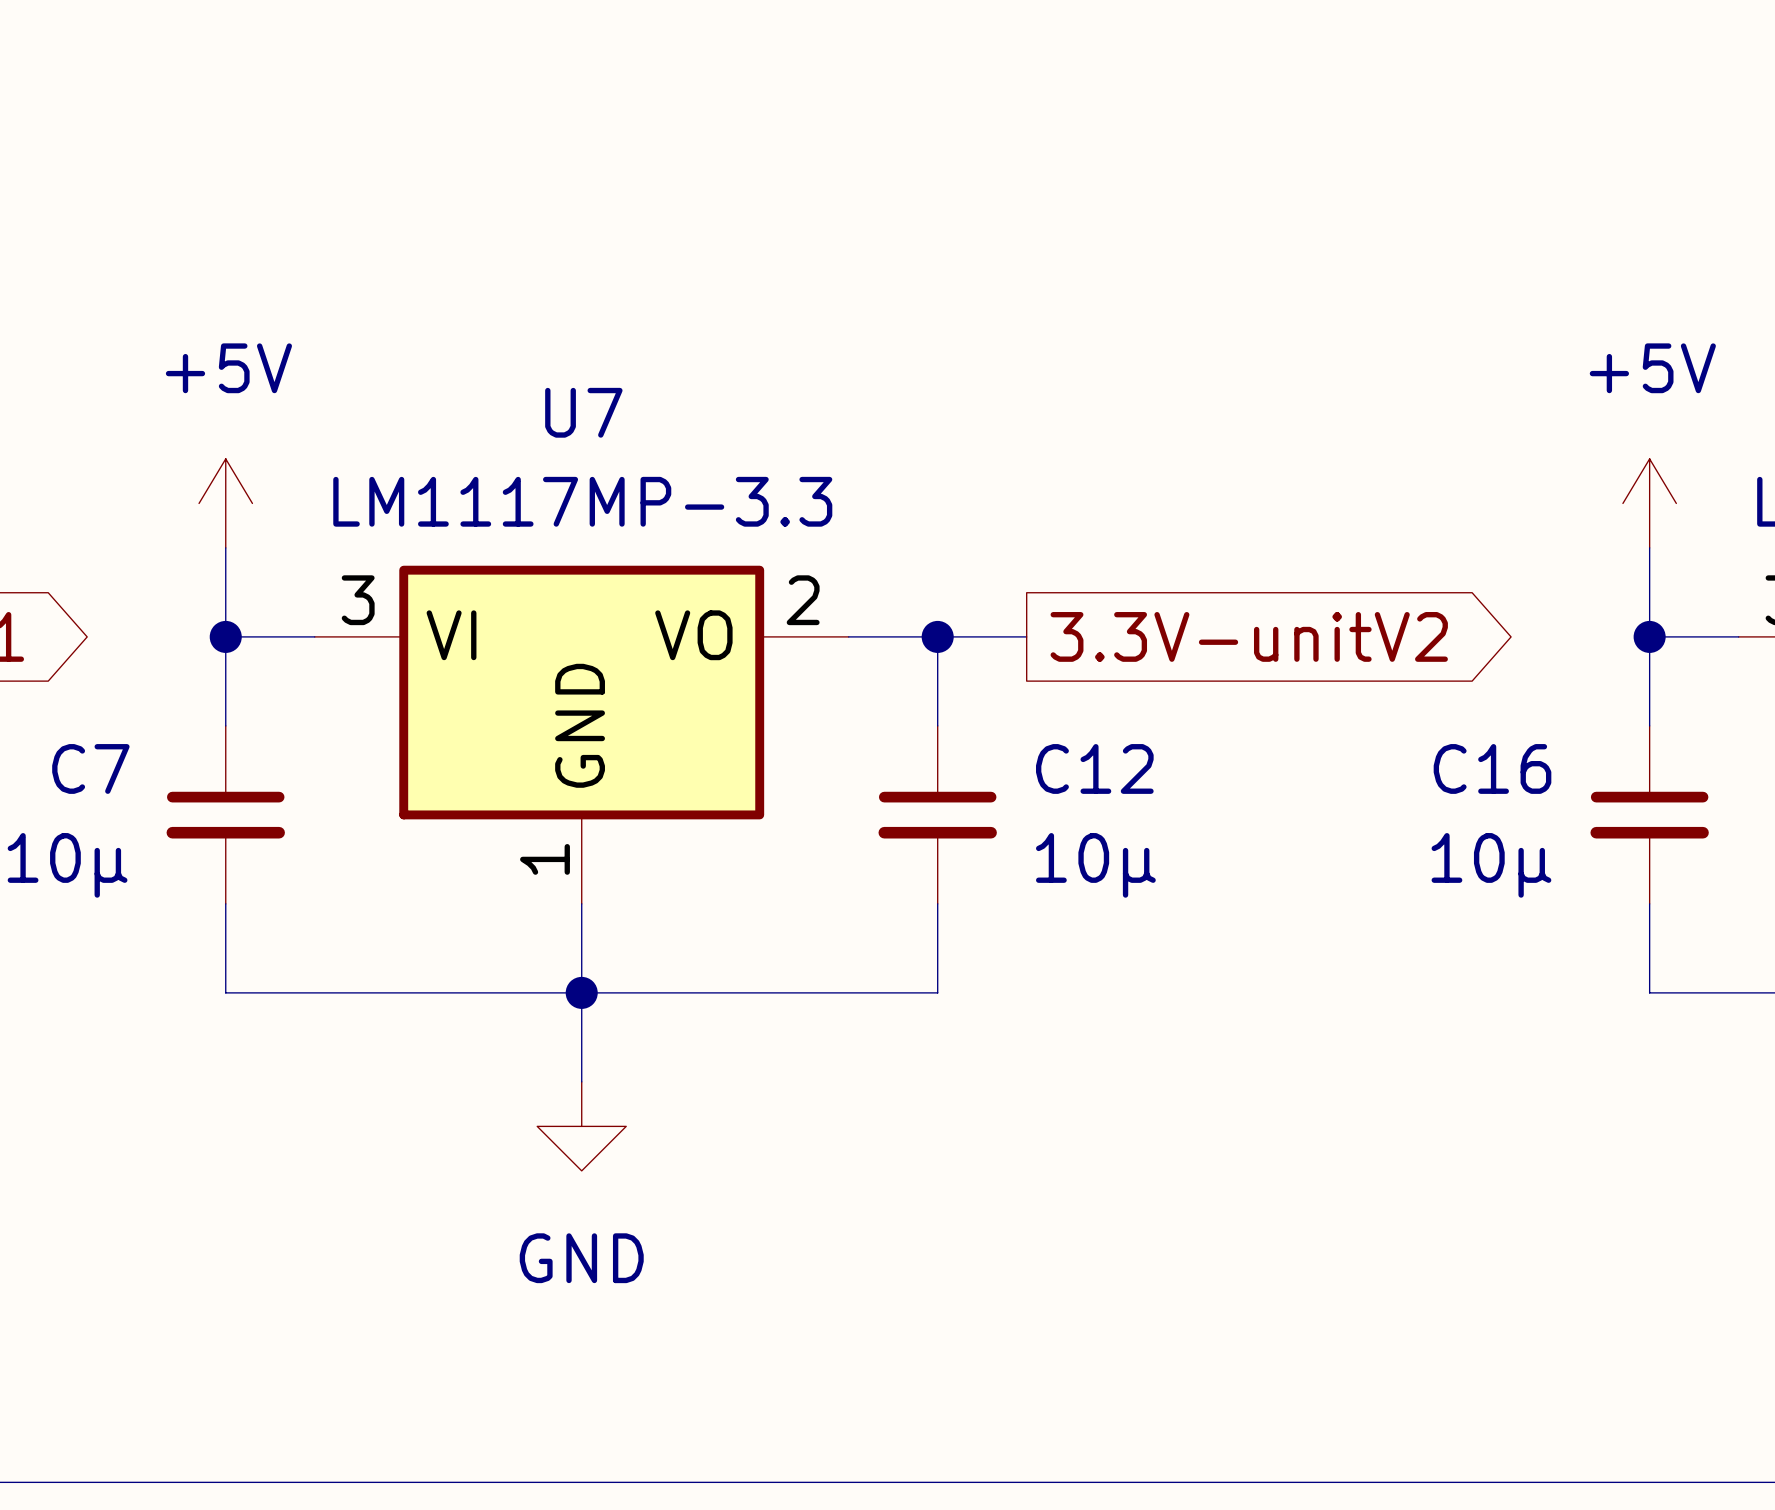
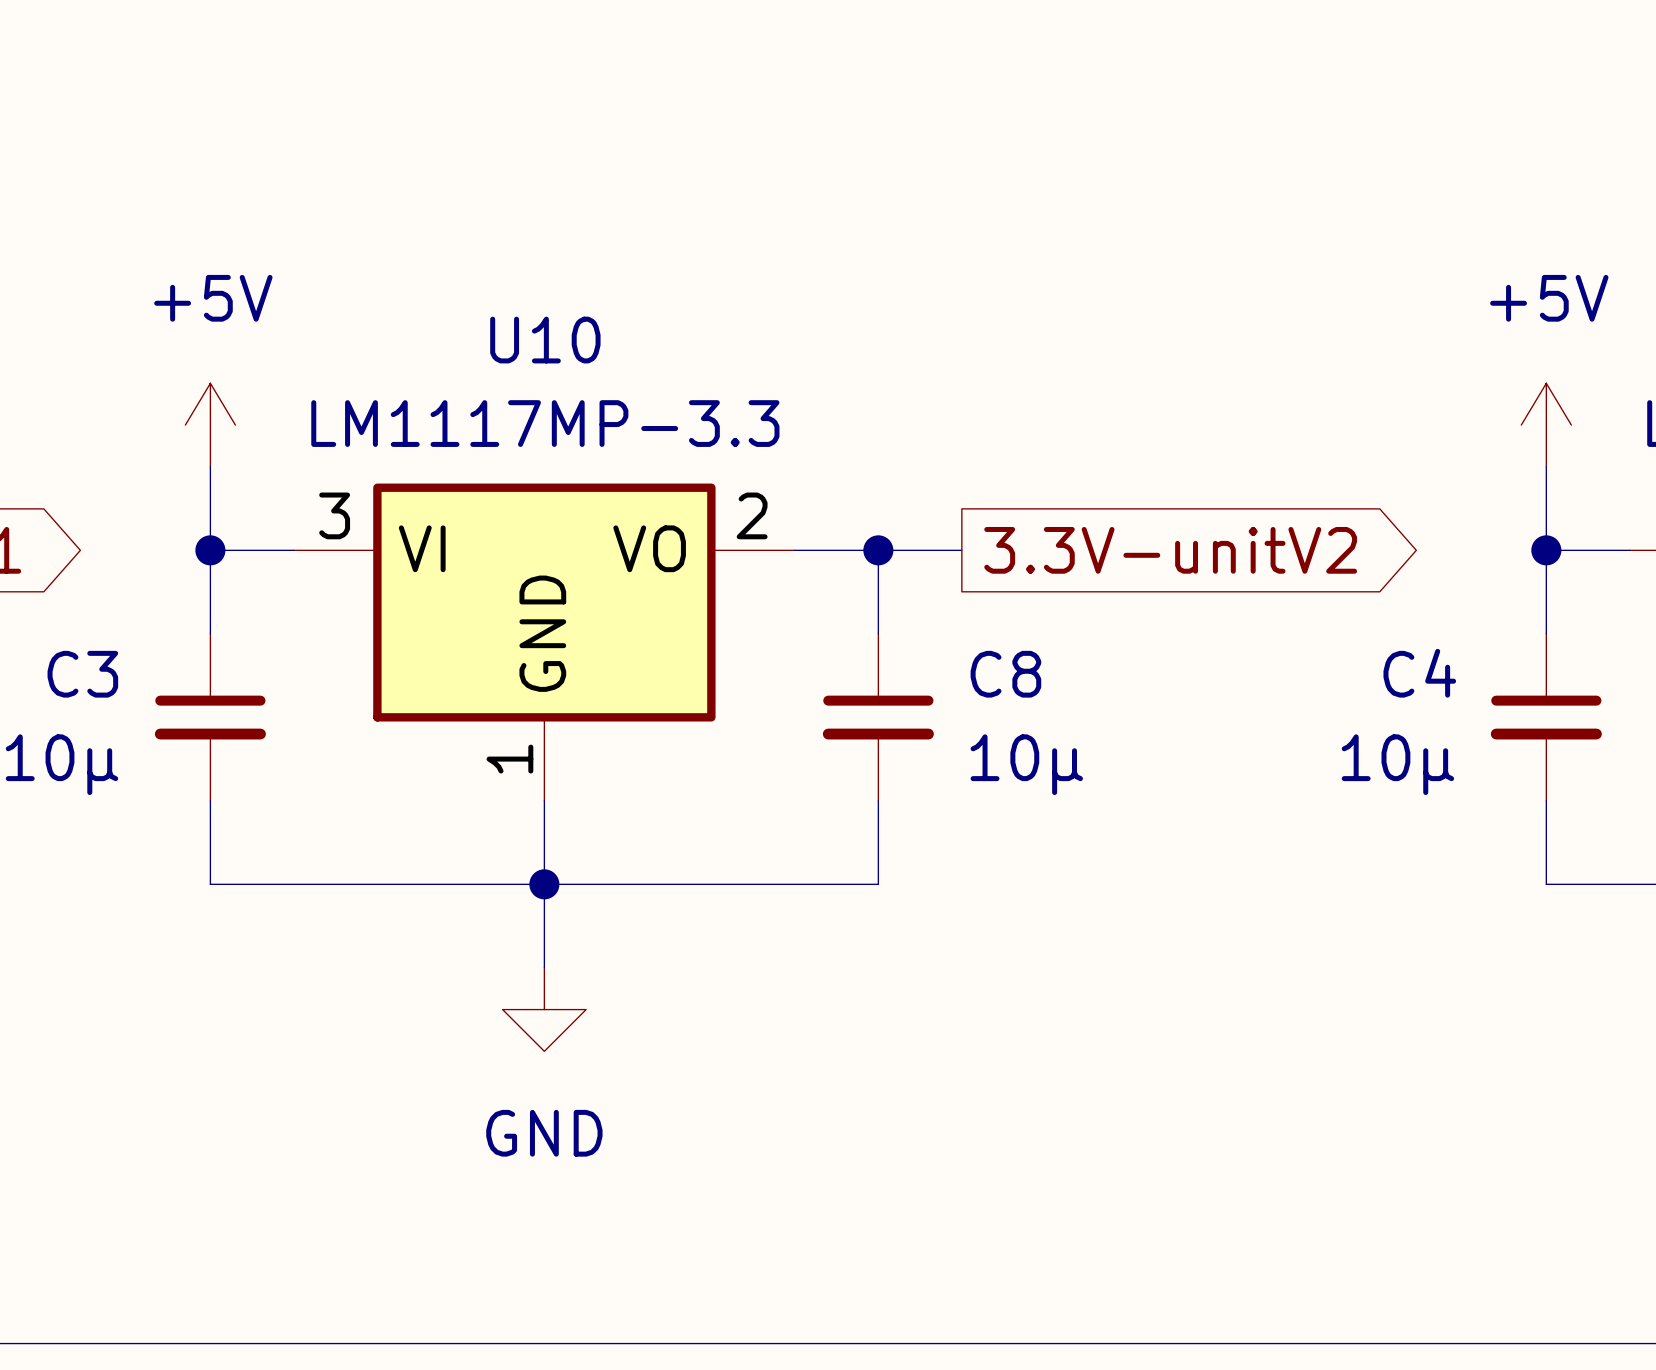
U7 name: U7 (583, 412) -> U10 (545, 340)
C7 name: C7 (90, 768) -> C3 (82, 674)
C12 name: C12 (1094, 768) -> C8 (1005, 674)
C16 name: C16 (1492, 768) -> C4 (1419, 673)

